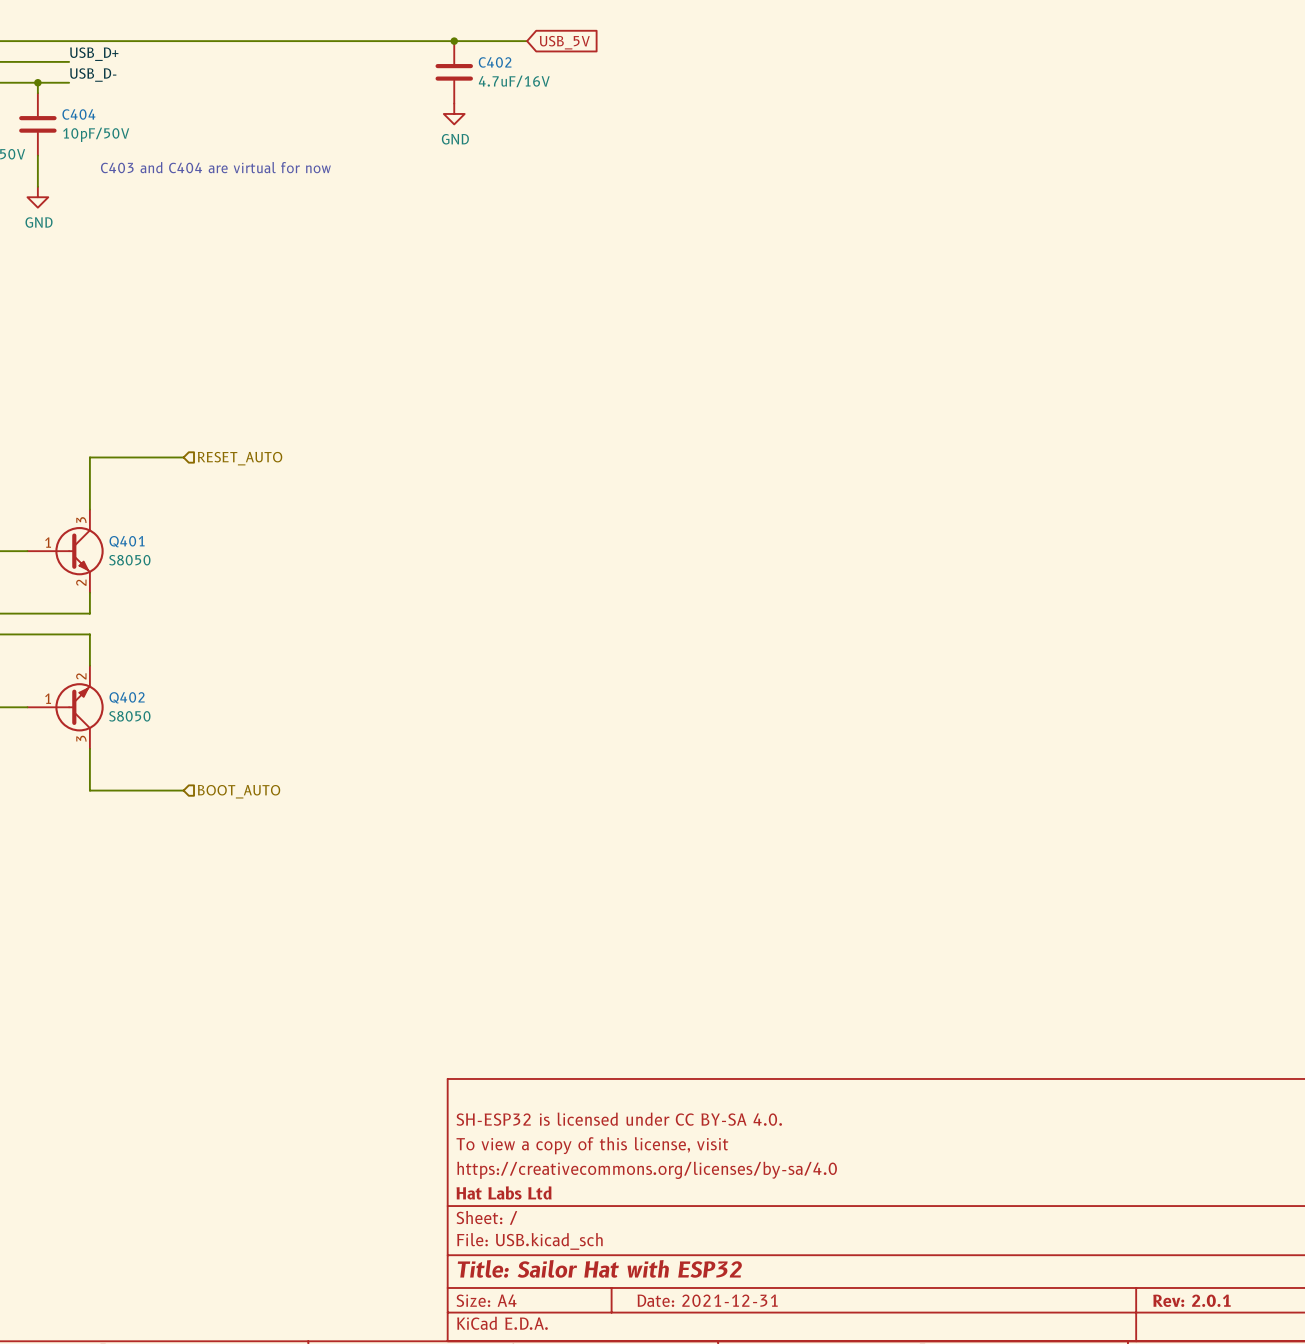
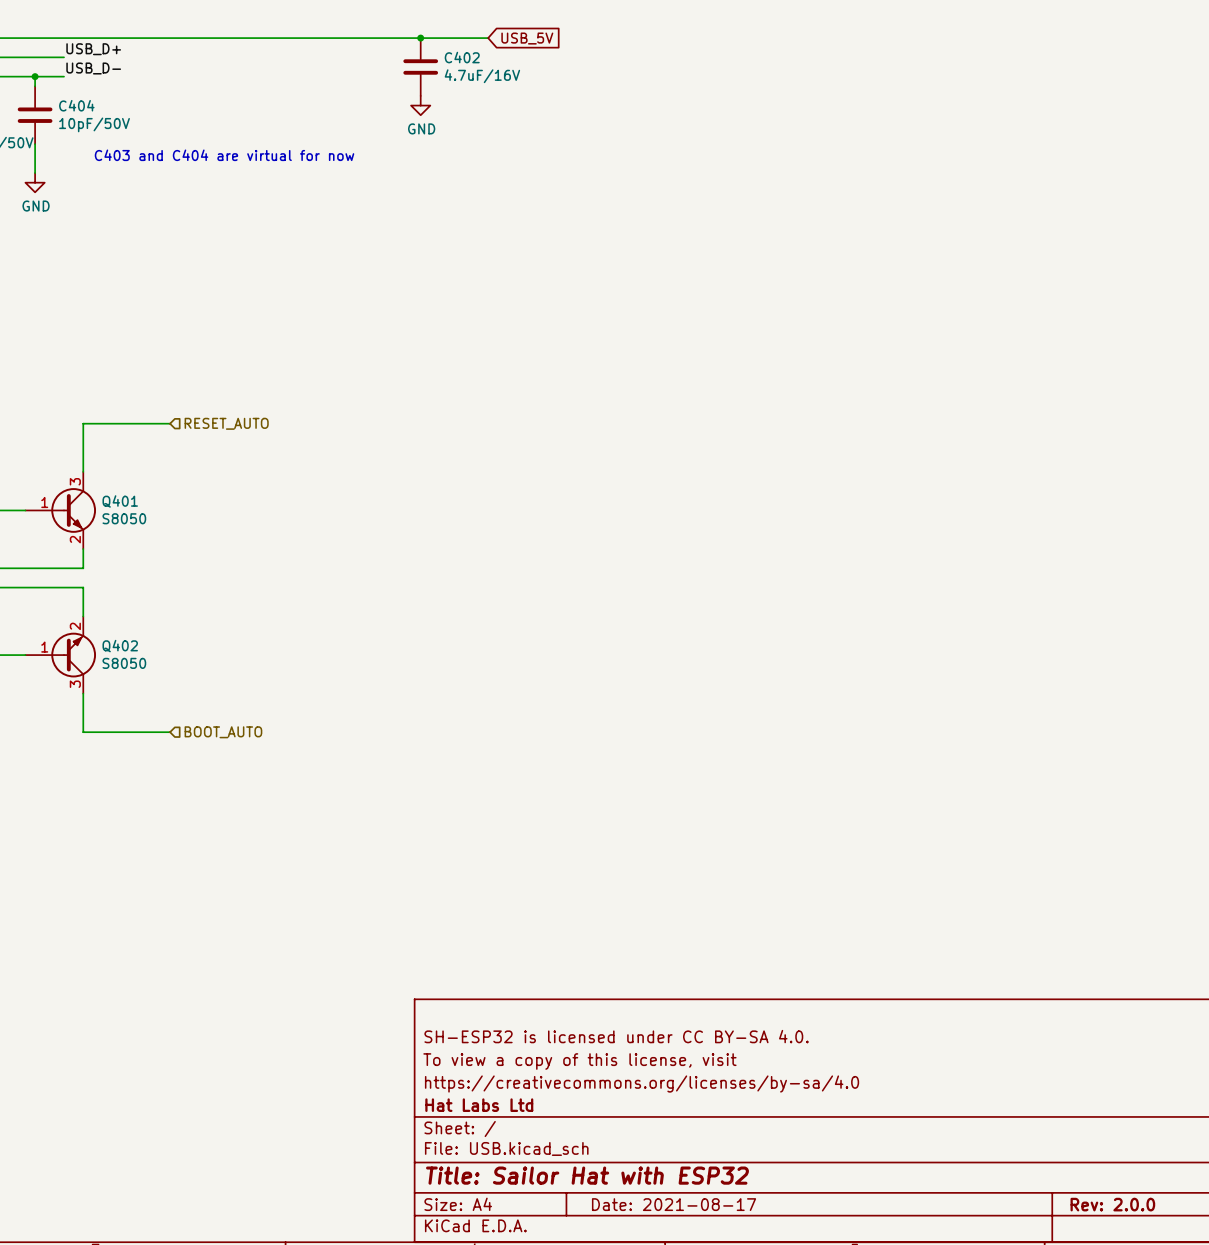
title block: Date: 2021-12-31 (707, 1300) -> Date: 2021-08-17 (674, 1204)
title block: Rev: 2.0.1 (1191, 1300) -> Rev: 2.0.0 (1112, 1204)

